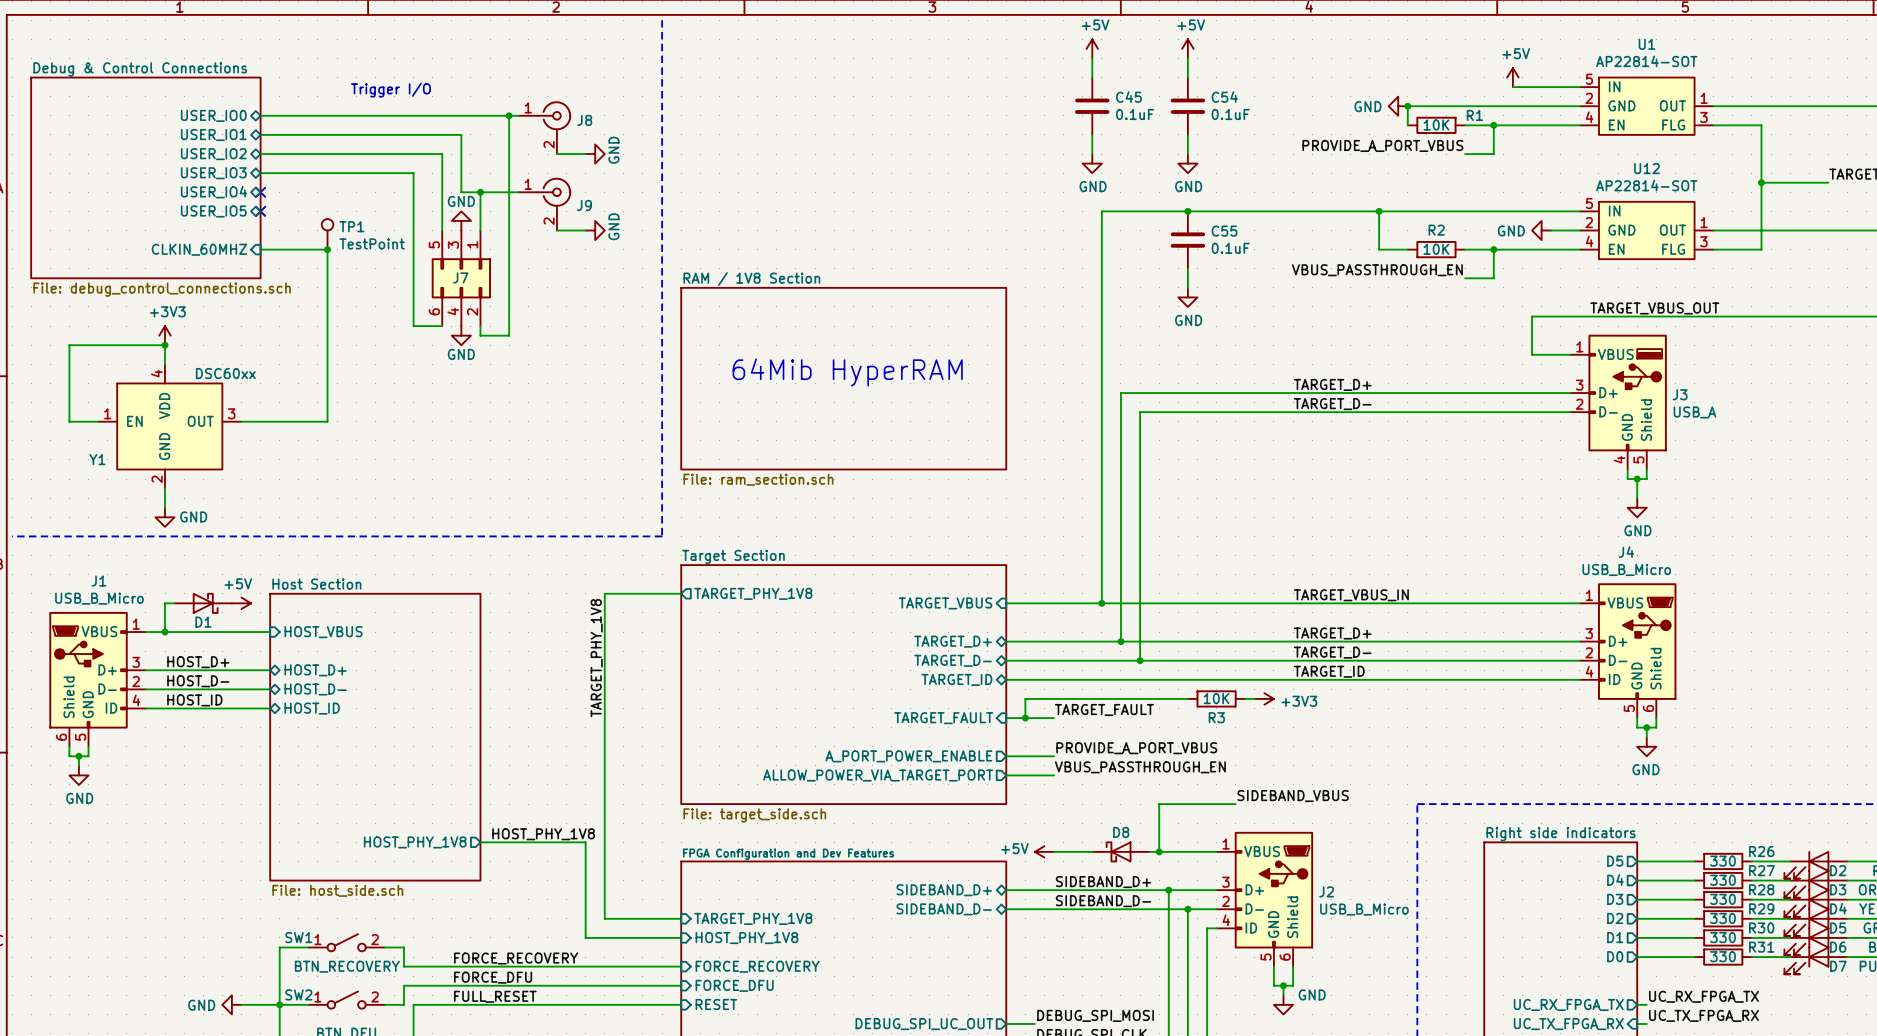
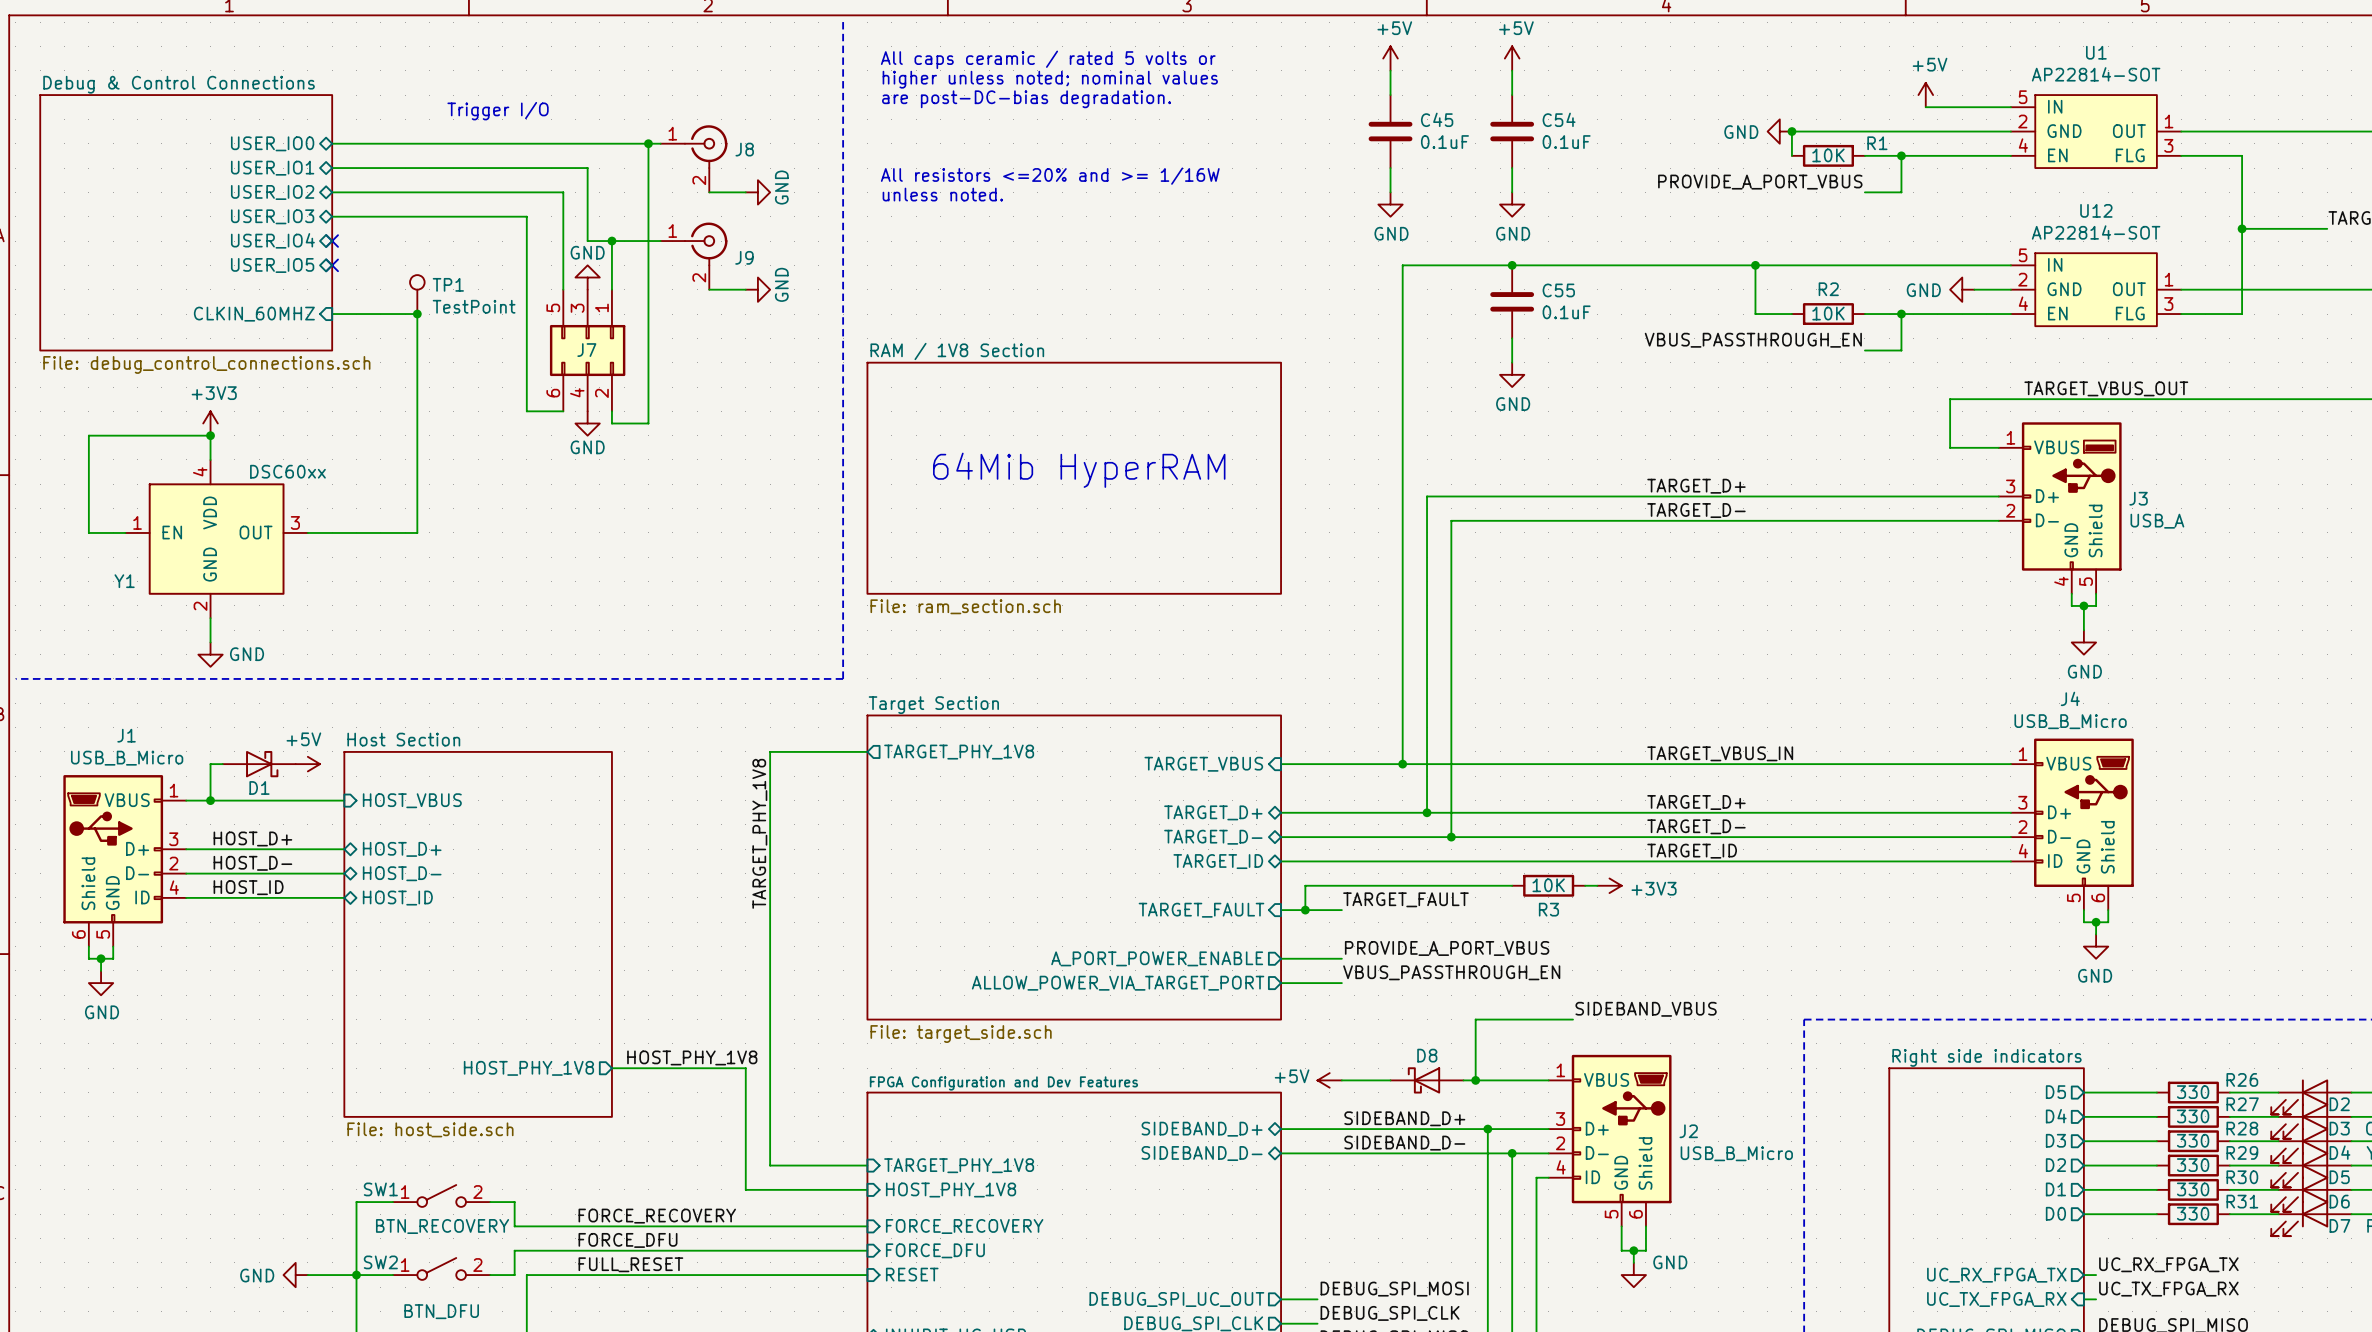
text: none -> All caps ceramic / rated 5 volts or (1048, 59)
text: none -> higher unless noted; nominal values (1050, 79)
text: none -> are post-DC-bias degradation. (1026, 99)
text: none -> All resistors <=20% and >= 1/16W (1050, 176)
text: none -> unless noted. (942, 194)

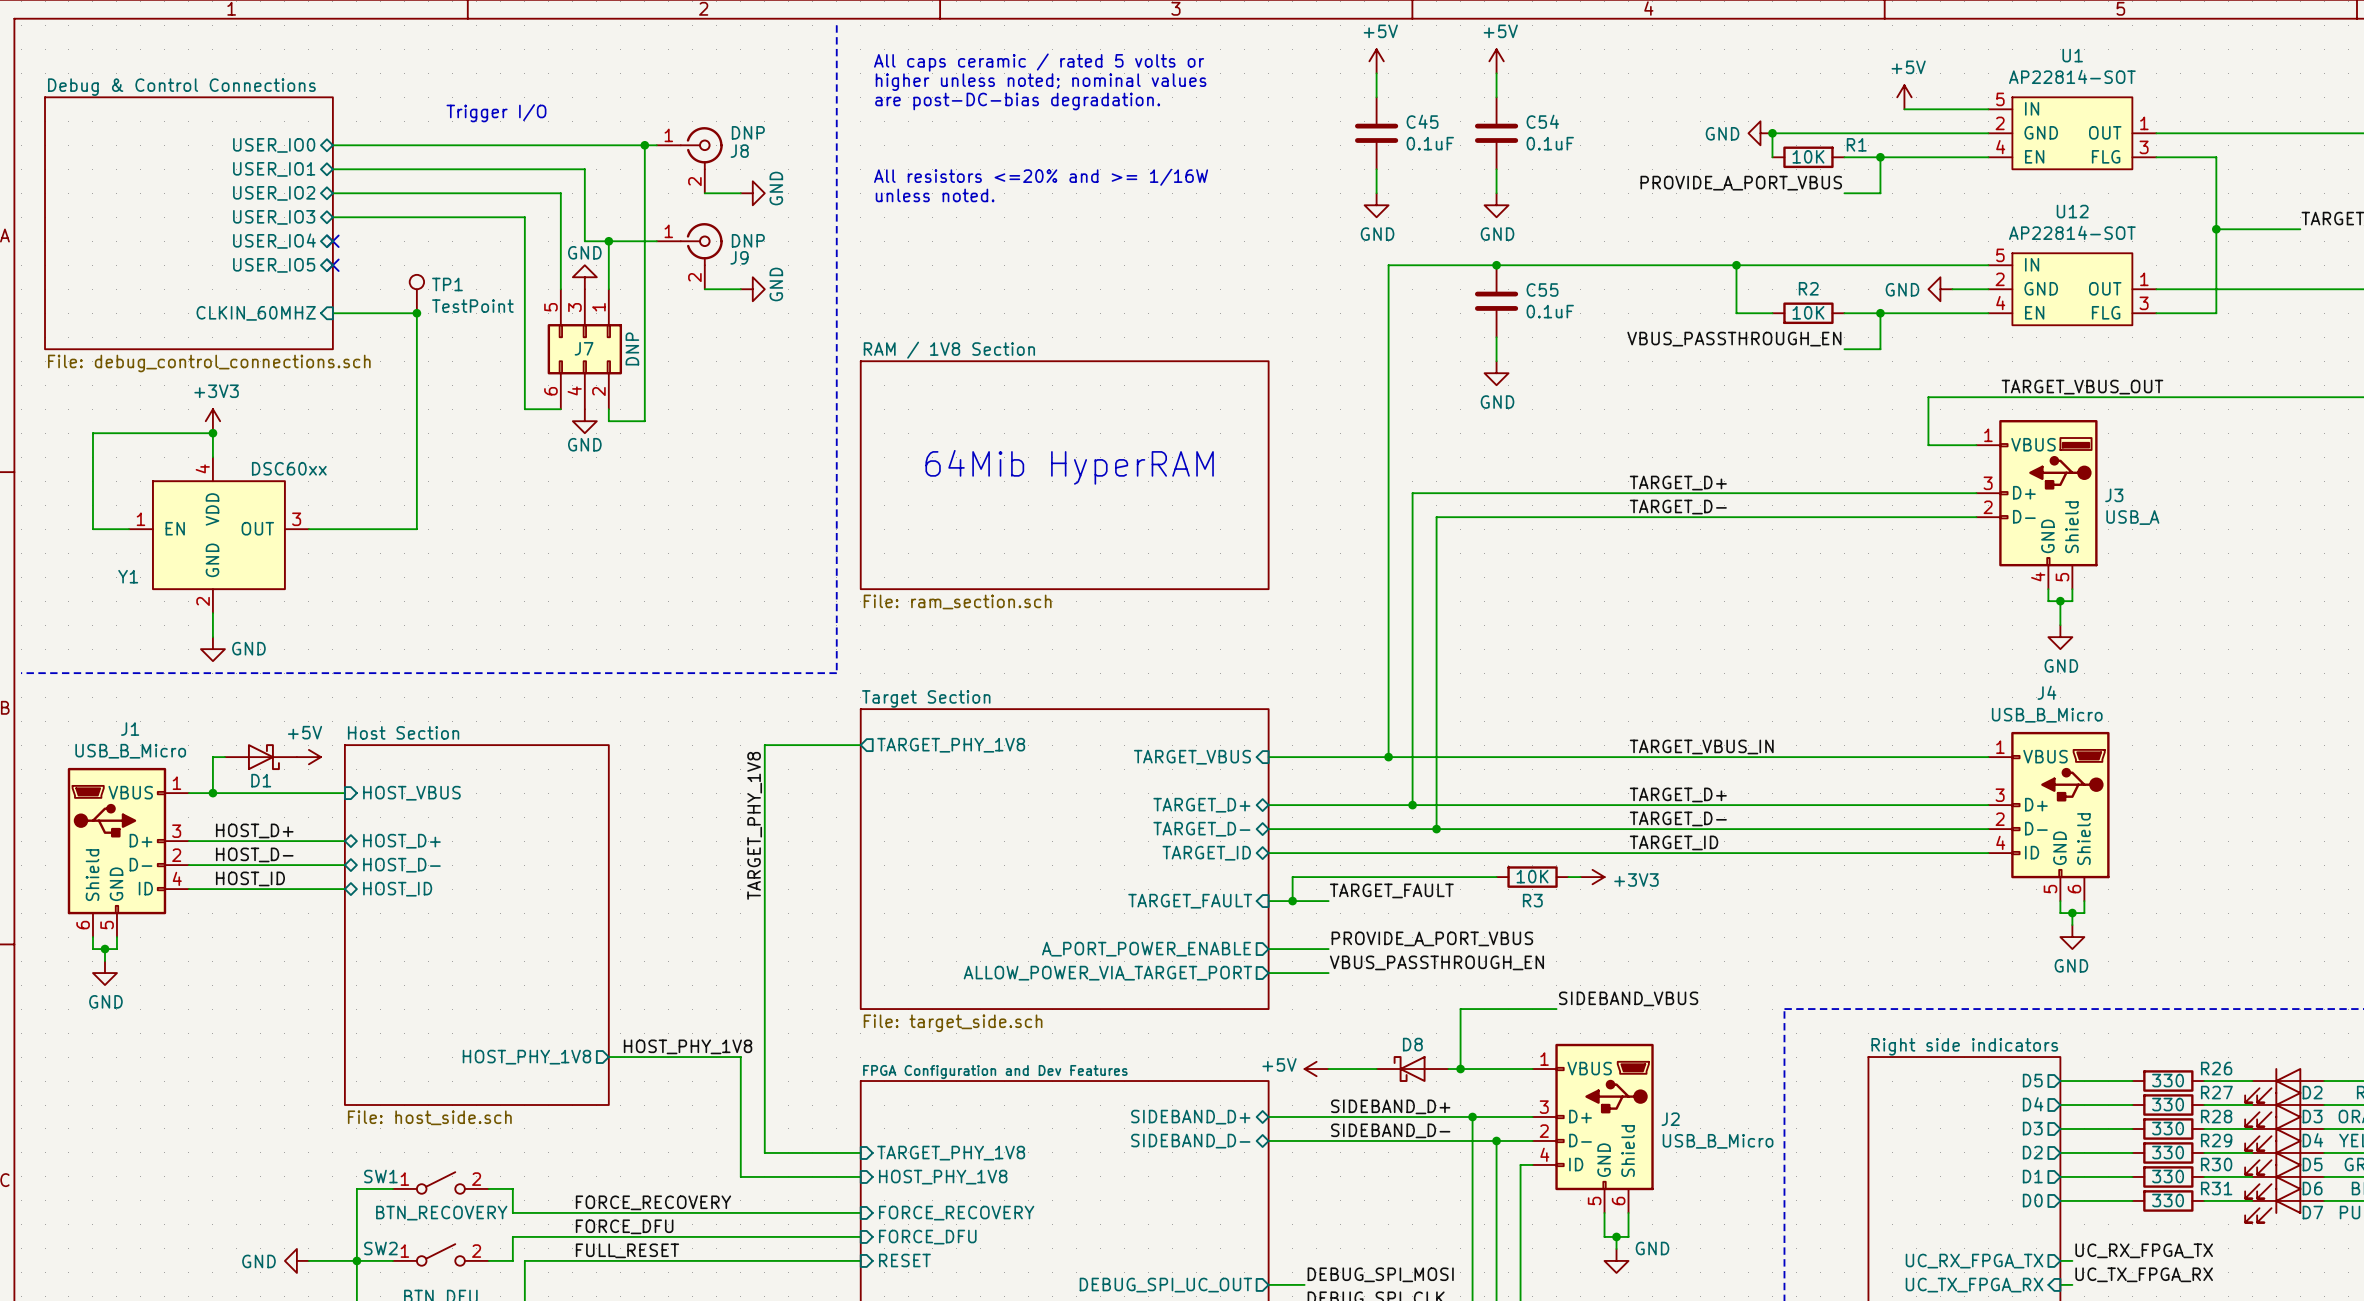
J8 text: none -> DNP (748, 132)
J9 text: none -> DNP (748, 240)
J7 text: none -> DNP (632, 348)

